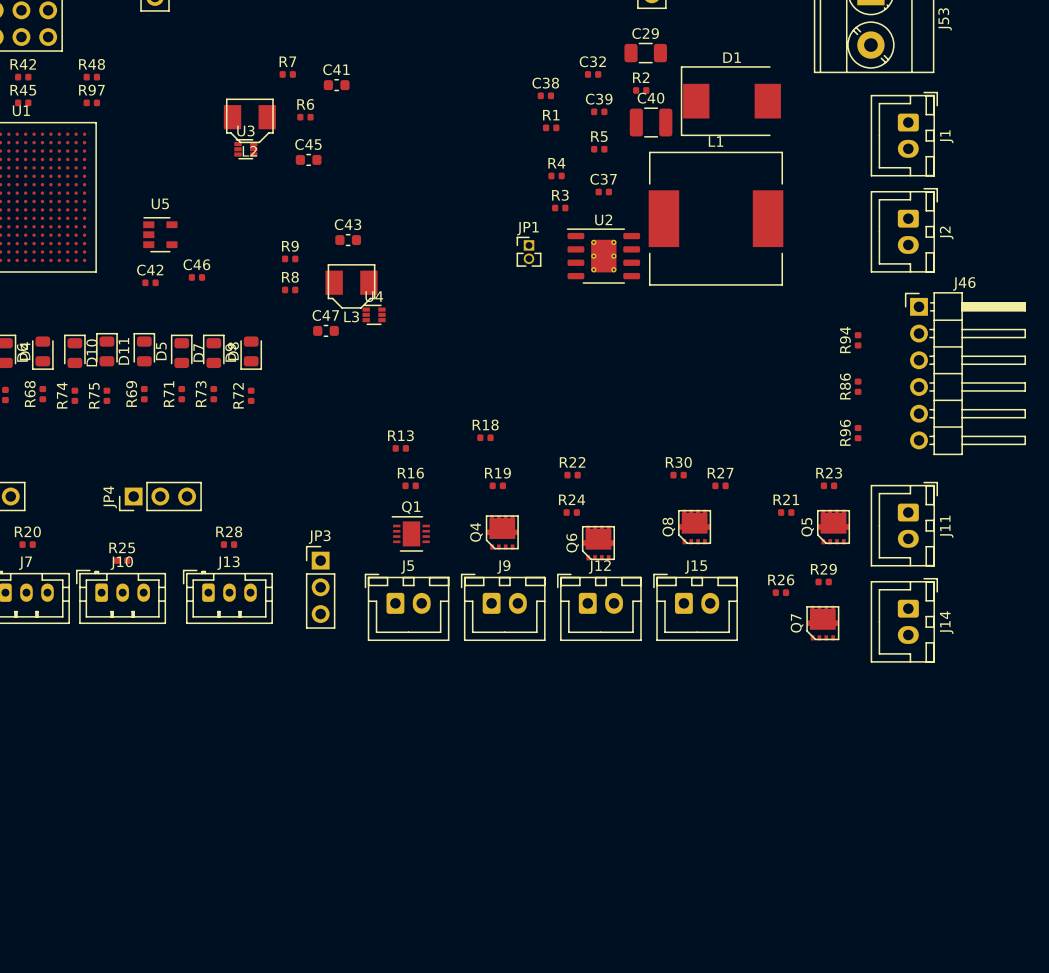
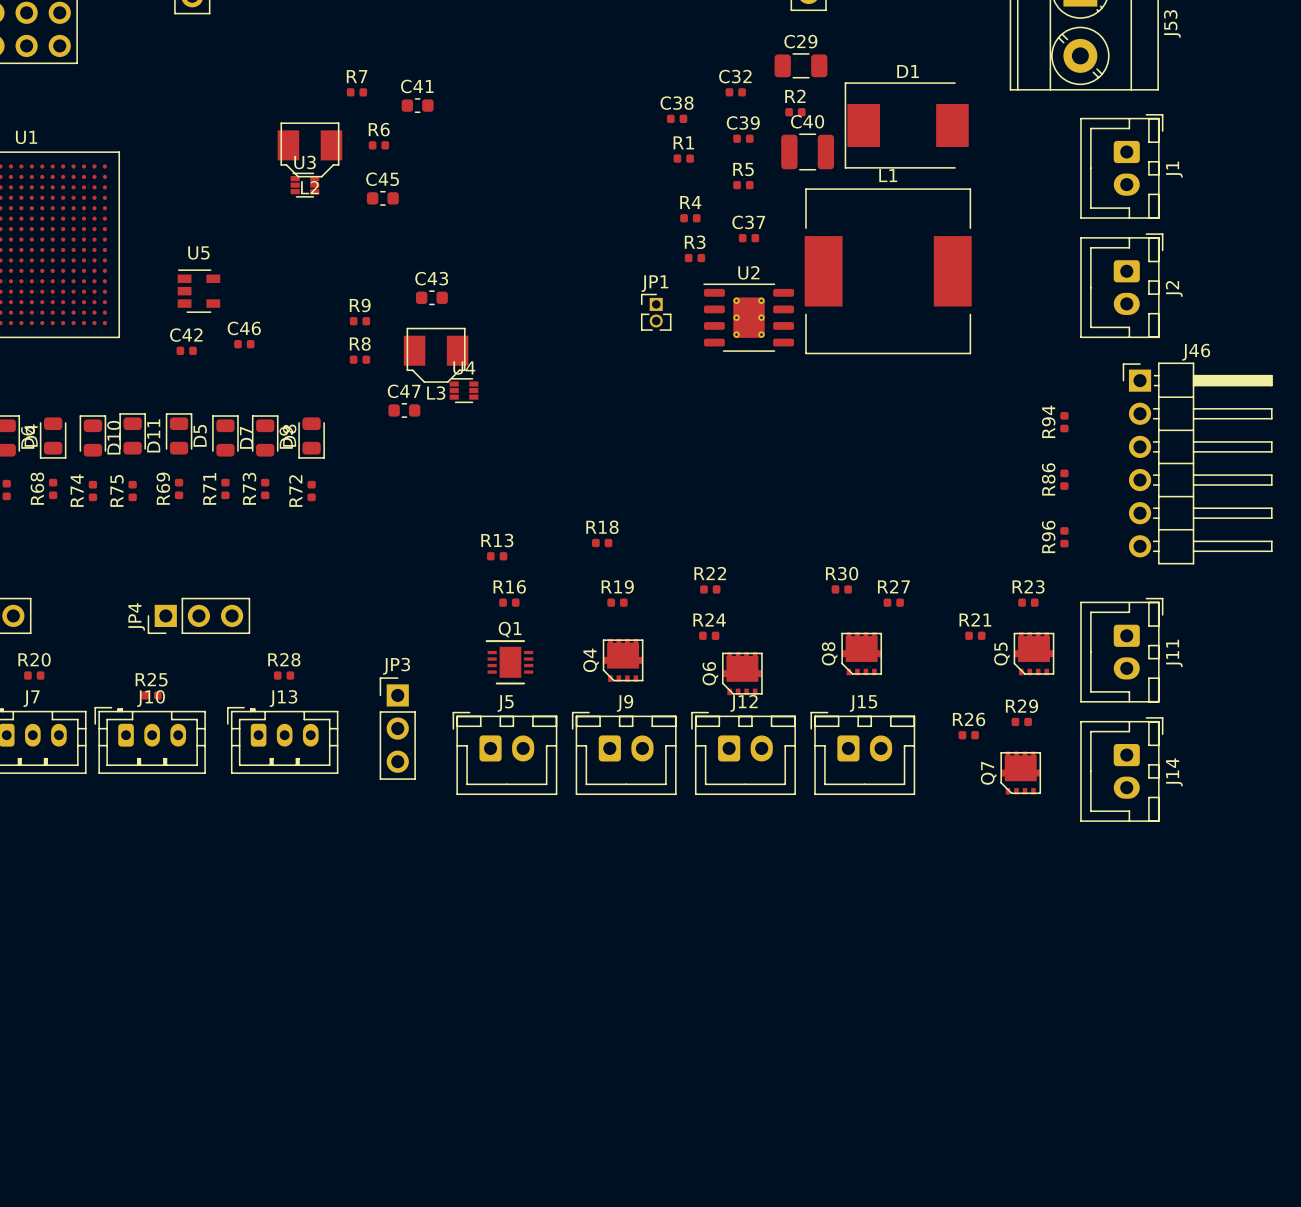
R42: (23, 77) -> none
R48: (91, 77) -> none
R45: (23, 102) -> none
R97: (91, 102) -> none

